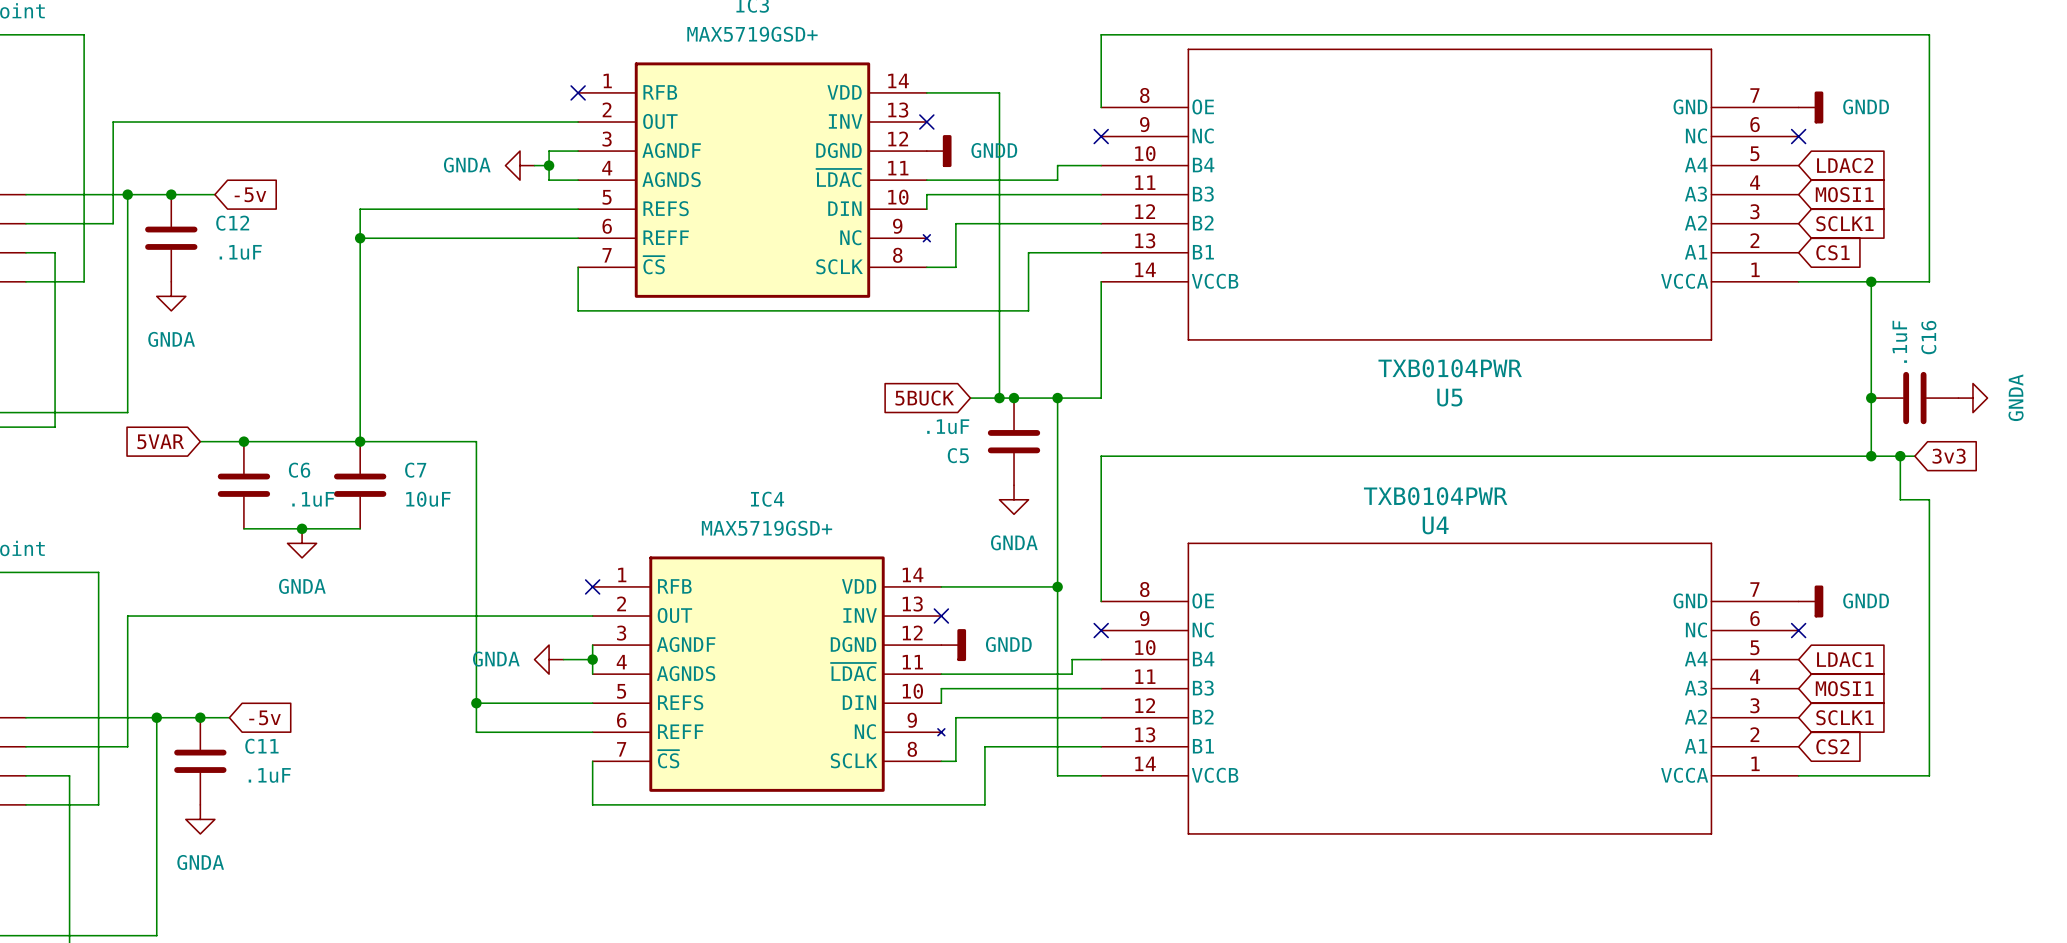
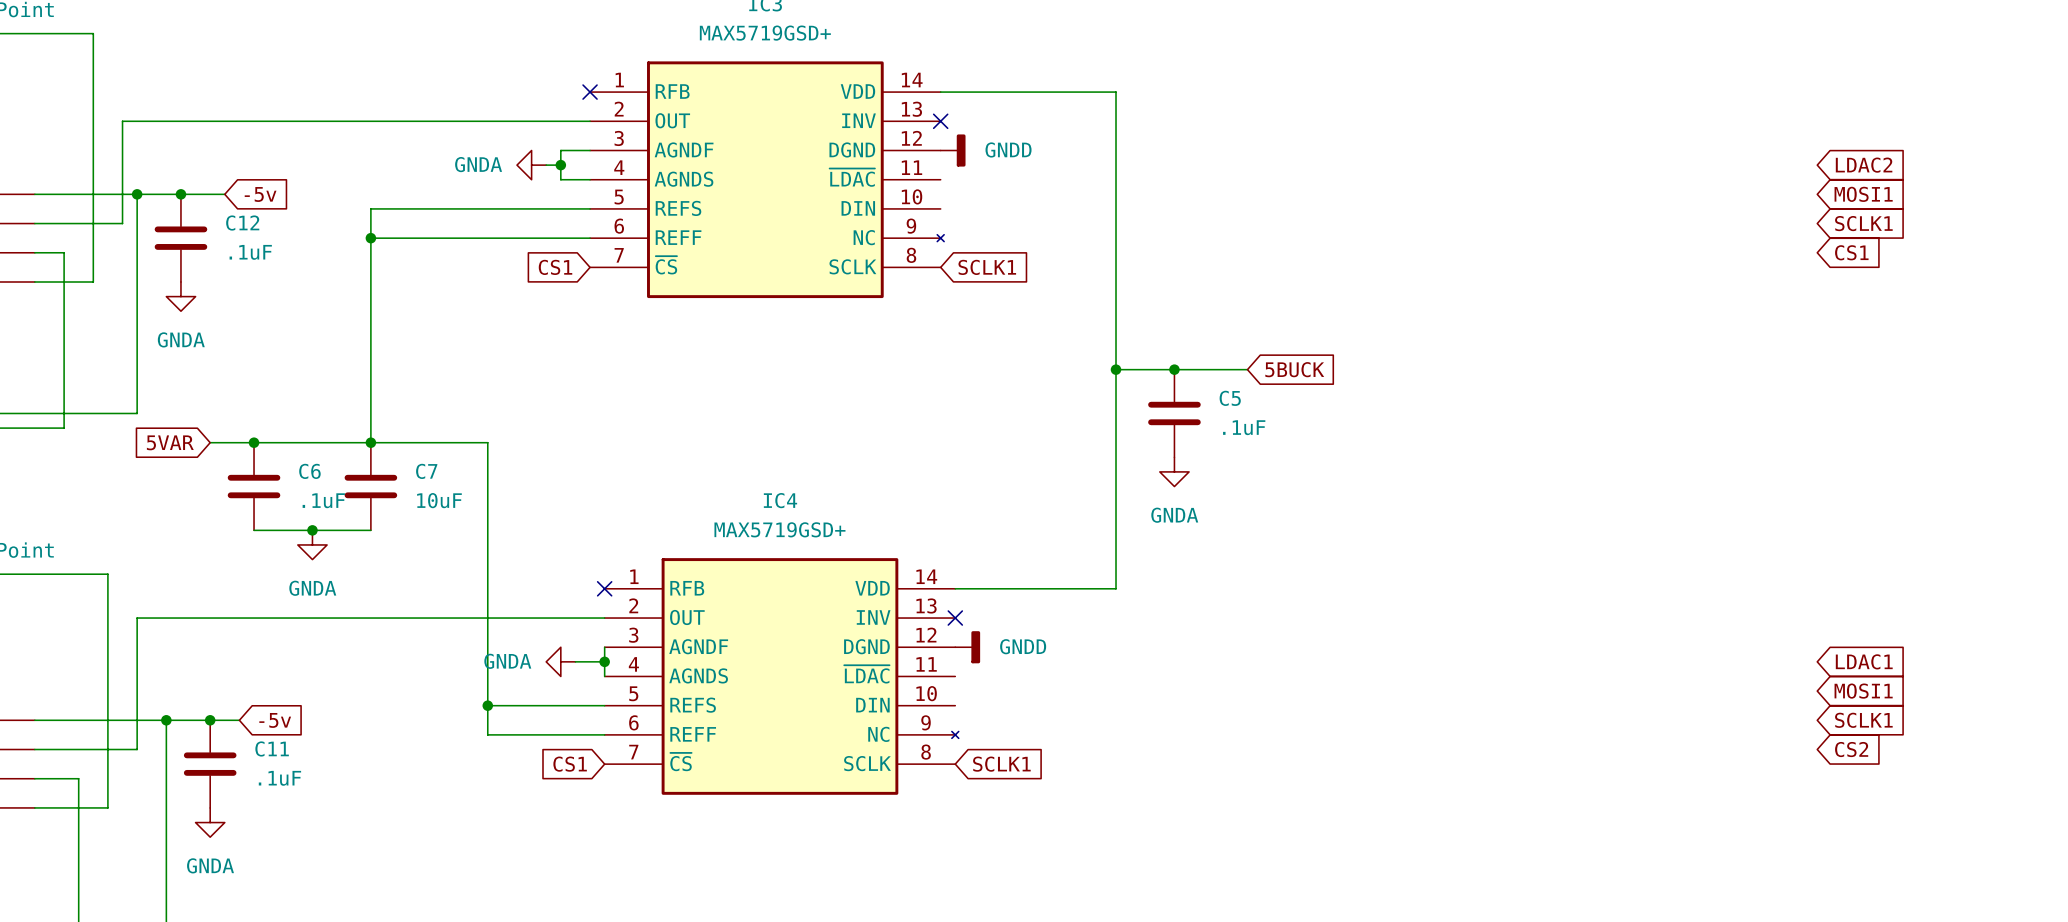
wire: (999, 92) (999, 398) -> (1013, 92) (1116, 92)
wire: (1101, 92) (1101, 34) (1929, 34) (1929, 281) (1798, 281) -> none
wire: none -> (1116, 106) (1116, 281)
power symbol: GNDD (1810, 107) -> none
no-connect mark: (1101, 136) -> none
no-connect mark: (1798, 136) -> none
wire: (1101, 165) (1057, 165) (1057, 180) (926, 180) -> none
wire: (1101, 194) (926, 194) (926, 209) -> none
U5: TXB0104PWR (1449, 194) -> none
wire: (1101, 223) (955, 223) (955, 267) (926, 267) -> none
wire: (1101, 252) (1028, 252) (1028, 310) (578, 310) (578, 267) -> none
global label: none -> CS1 (555, 267)
global label: none -> SCLK1 (987, 267)
wire: (1871, 281) (1871, 456) -> none
junction: (1871, 281) -> none
wire: none -> (1116, 369) (1247, 369)
junction: none -> (1116, 369)
junction: none -> (1174, 369)
global label rotation: 0° (924, 398) -> 180° (1294, 369)
global label position: 5BUCK (924, 398) -> 5BUCK (1294, 369)
wire: (970, 398) (1101, 398) -> (1116, 457) (1116, 398)
junction: (999, 398) -> none
junction: (1014, 398) -> none
wire: (1057, 398) (1057, 775) (1101, 775) -> none
junction: (1057, 398) -> none
junction: (1871, 398) -> none
C16: .1uF (1914, 398) -> none
power symbol: GNDA (1972, 398) -> none
C5 value position: .1uF (948, 426) -> .1uF (1244, 427)
C5 position: (1014, 441) -> (1174, 413)
C5 name position: C5 (958, 455) -> C5 (1230, 398)
wire: (1101, 456) (1914, 456) -> none
junction: (1871, 456) -> none
wire: (1900, 456) (1900, 499) (1929, 499) (1929, 775) (1798, 775) -> none
junction: (1900, 456) -> none
global label: 3v3 (1949, 456) -> none
power symbol position: GNDA (1014, 499) -> GNDA (1174, 471)
junction: (1057, 586) -> none
wire: (1101, 586) (1101, 601) -> (1116, 588) (1072, 588)
power symbol: GNDD (1810, 601) -> none
no-connect mark: (1101, 630) -> none
no-connect mark: (1798, 630) -> none
wire: (1101, 659) (1072, 659) (1072, 674) (941, 674) -> none
wire: (1101, 688) (941, 688) (941, 703) -> none
U4: TXB0104PWR (1449, 688) -> none
wire: (1101, 717) (955, 717) (955, 761) (941, 761) -> none
wire: (1101, 746) (984, 746) (984, 804) (592, 804) (592, 761) -> none
global label: none -> CS1 (570, 764)
global label: none -> SCLK1 (1001, 764)

